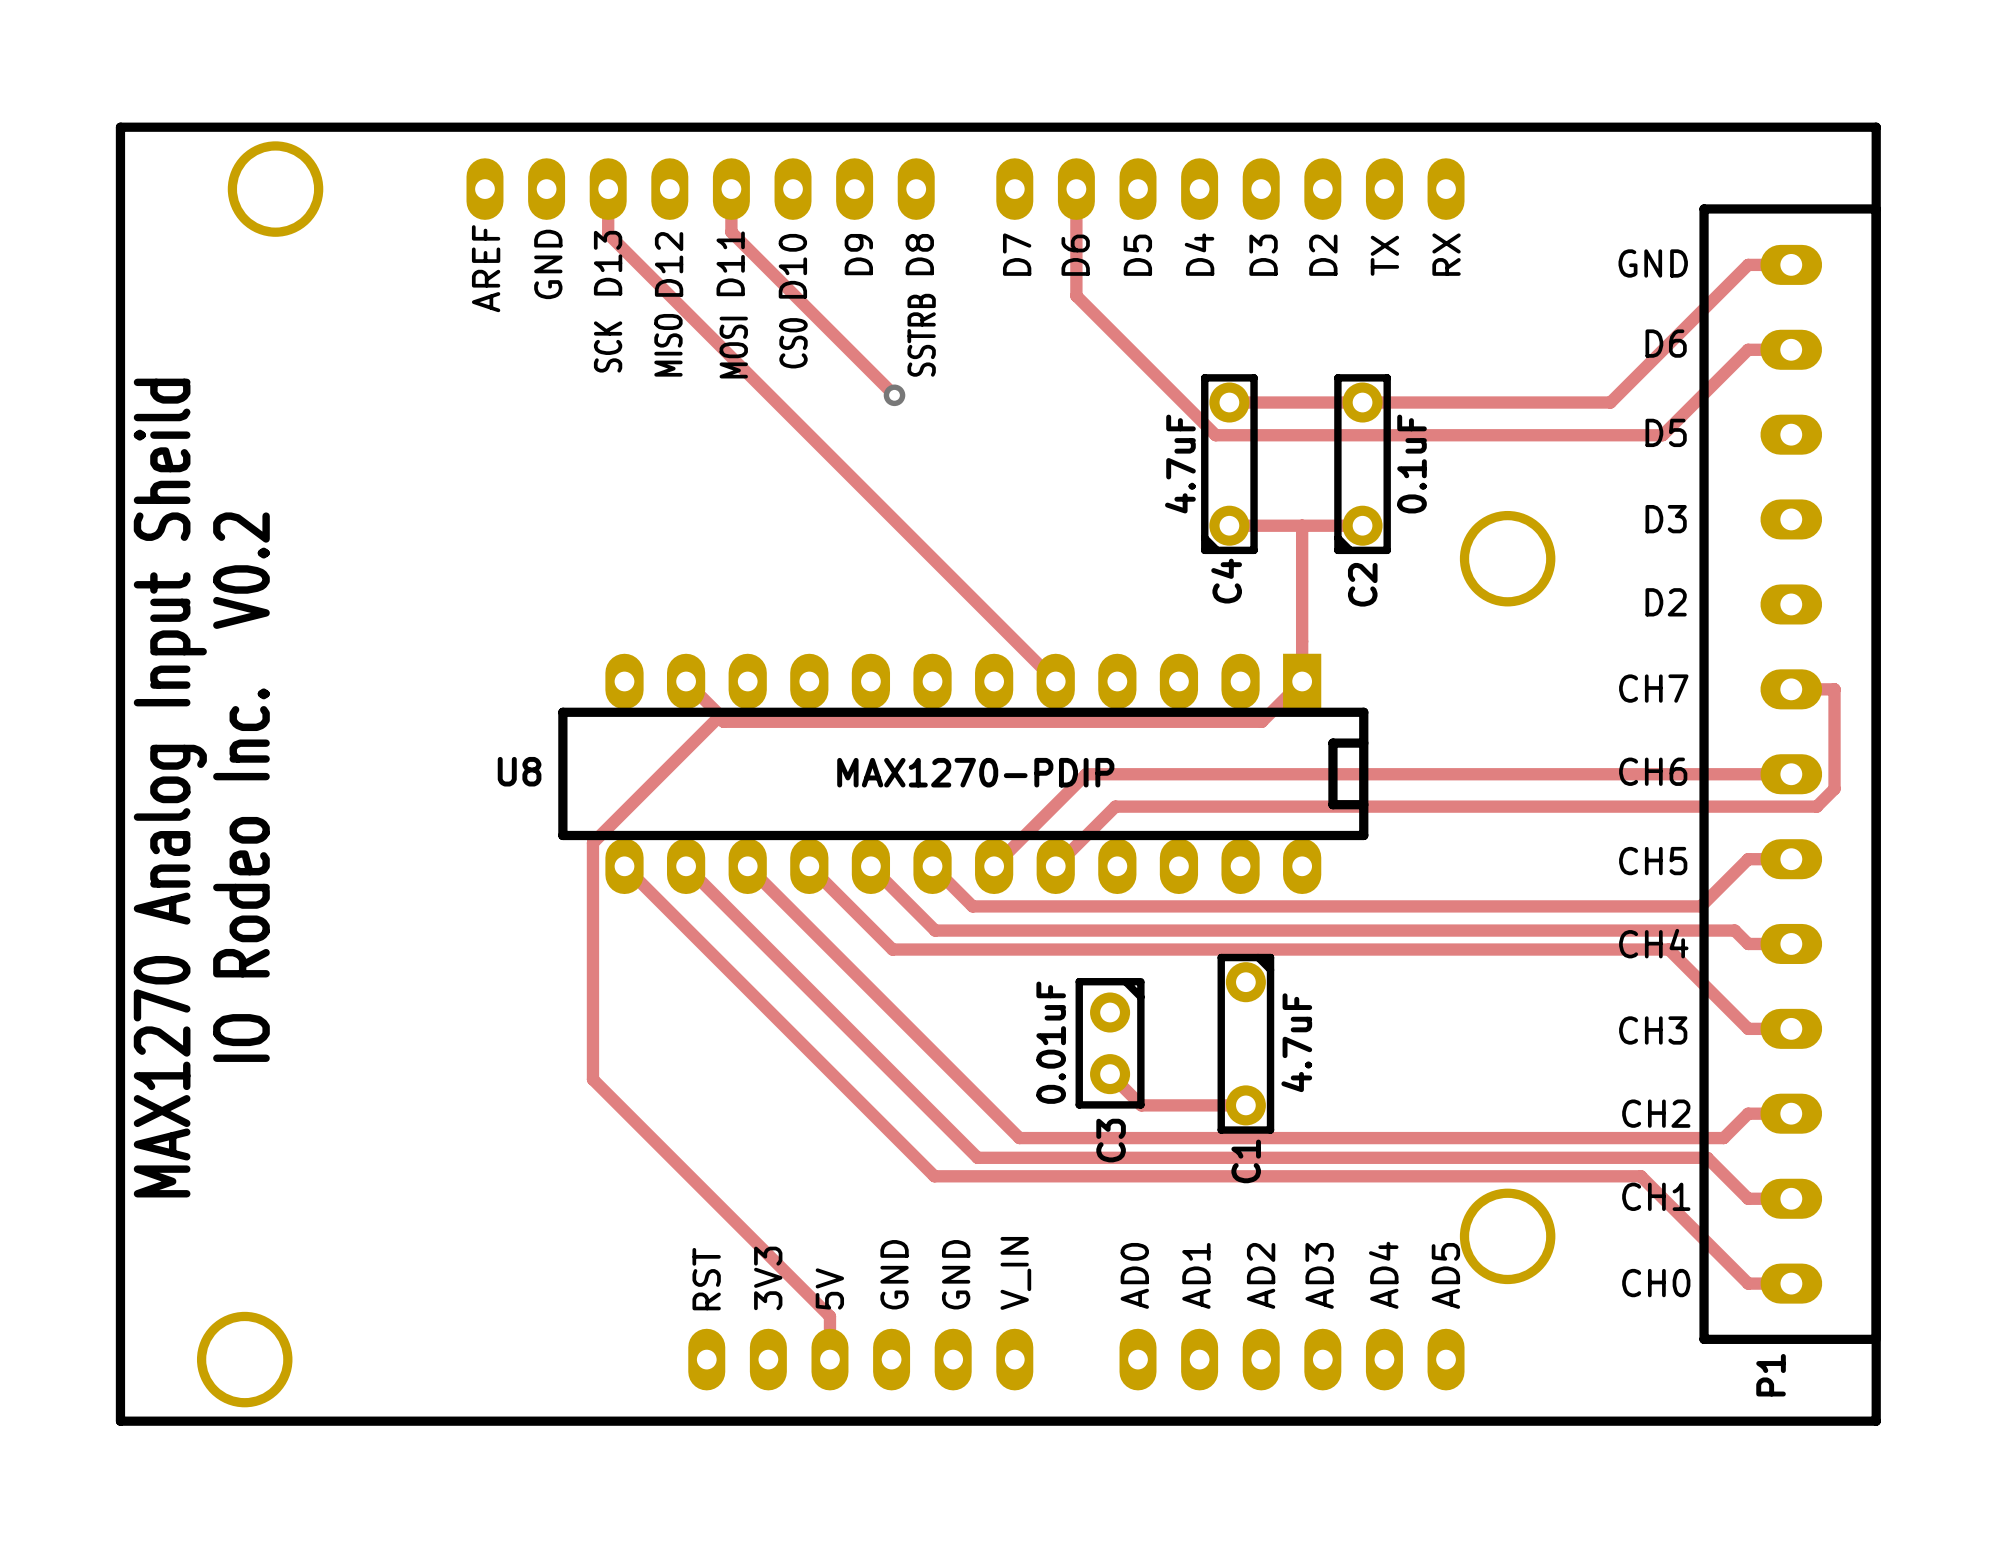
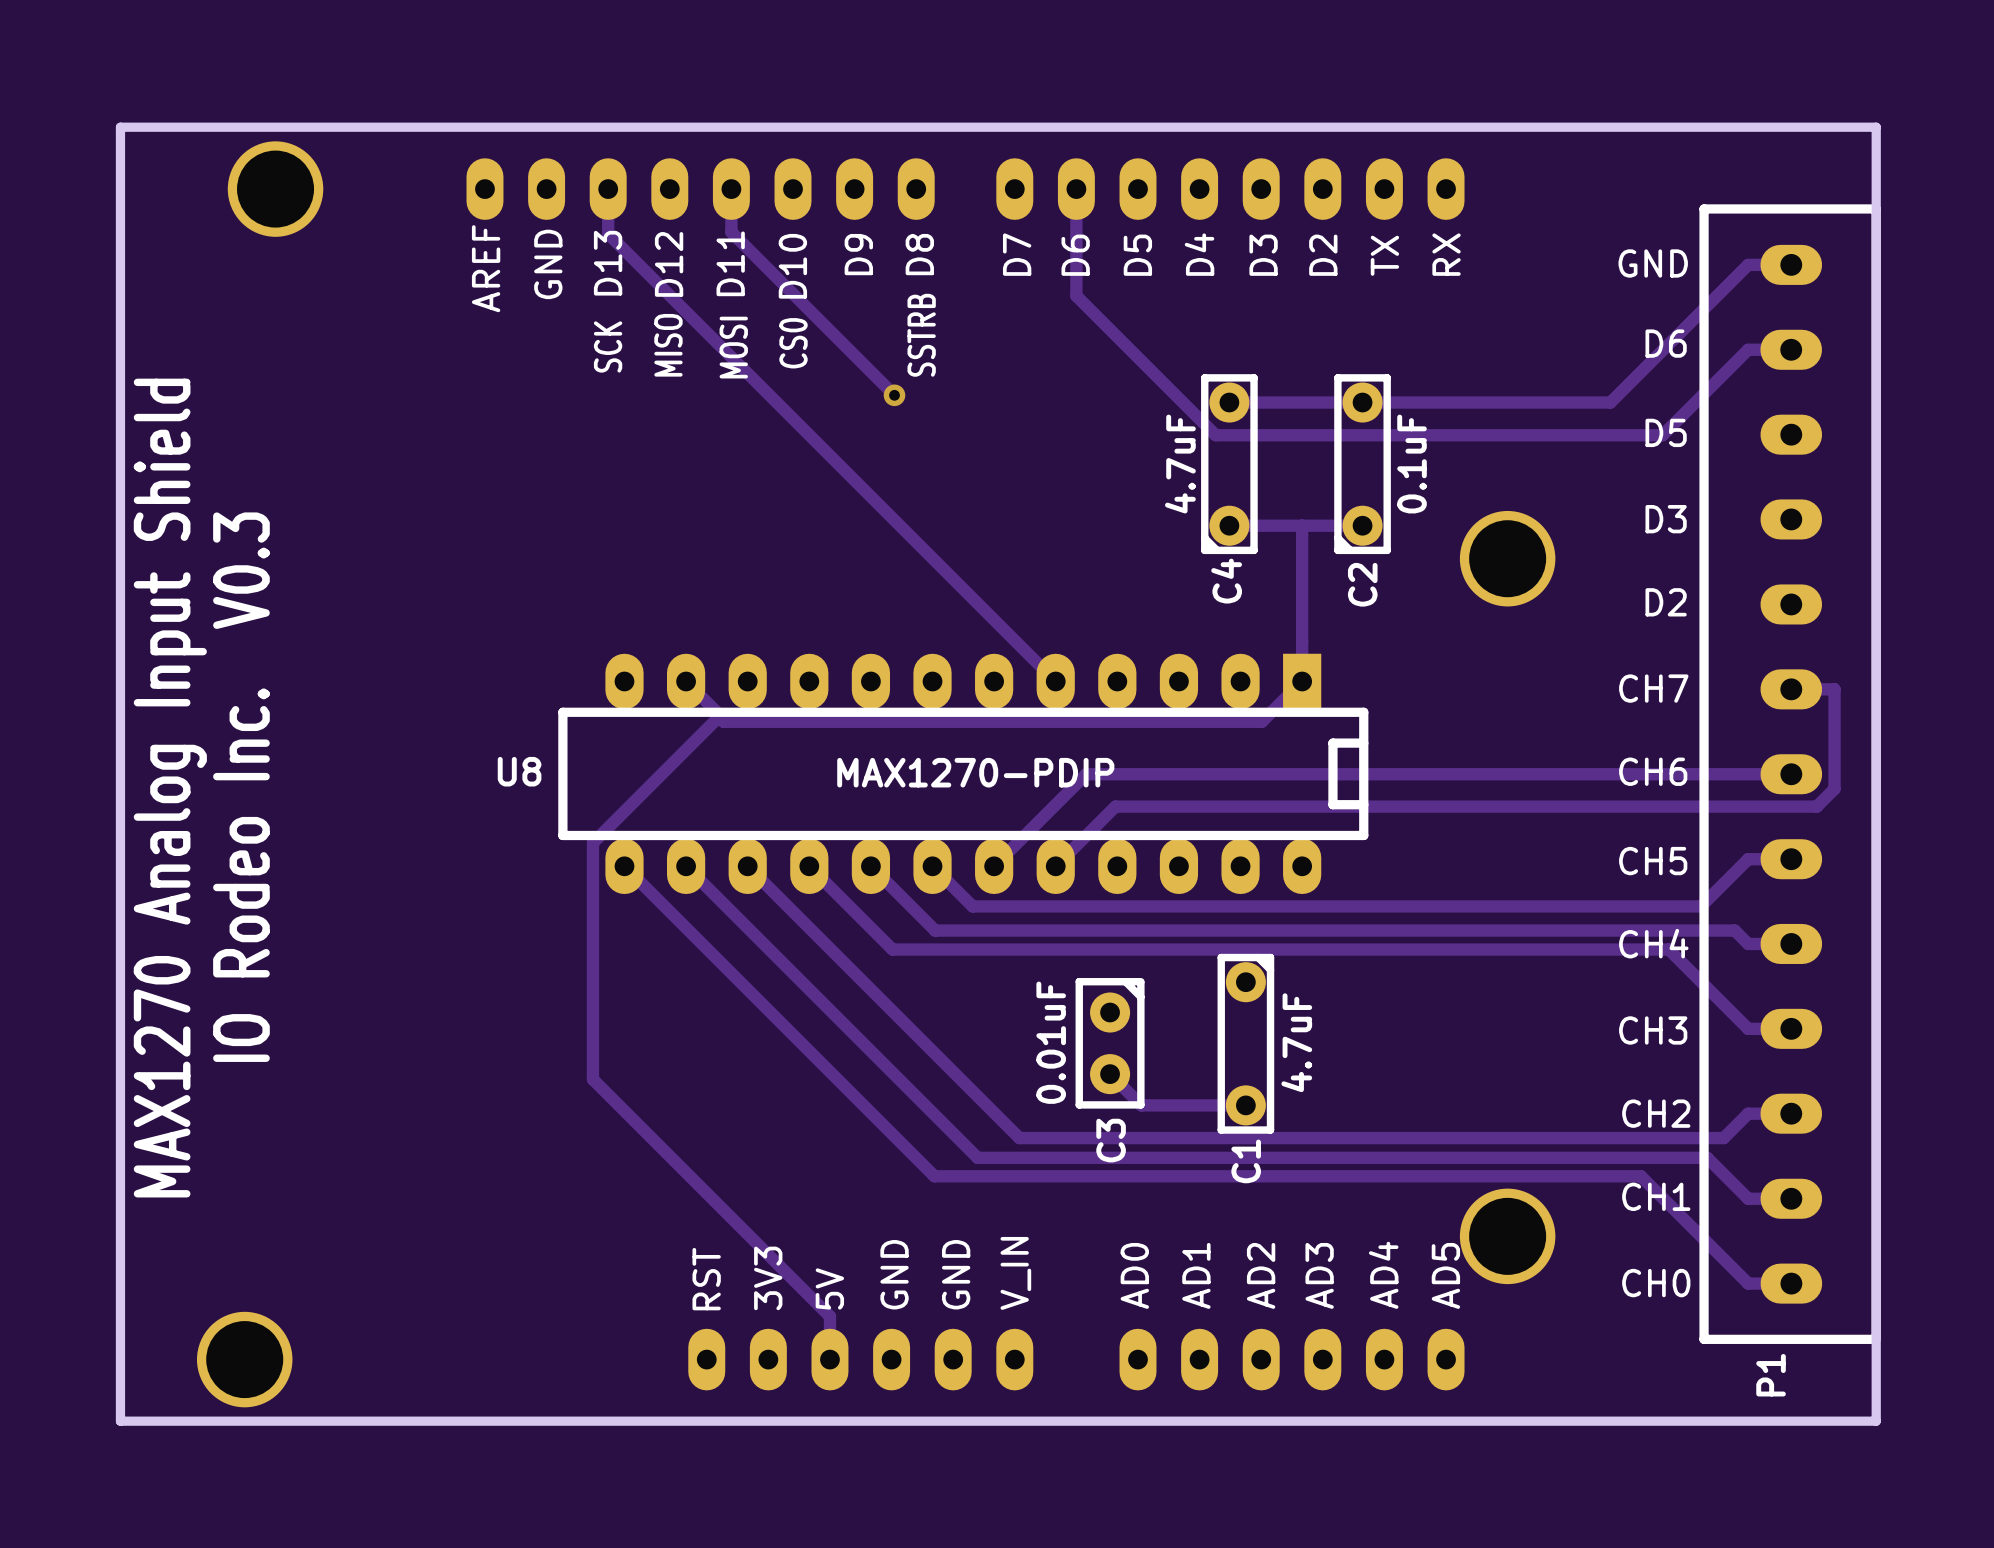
text: IO Rodeo Inc. V0.2 (241, 787) -> IO Rodeo Inc. V0.3 (241, 787)
text: MAX1270 Analog Input Sheild (170, 788) -> MAX1270 Analog Input Shield (170, 788)

